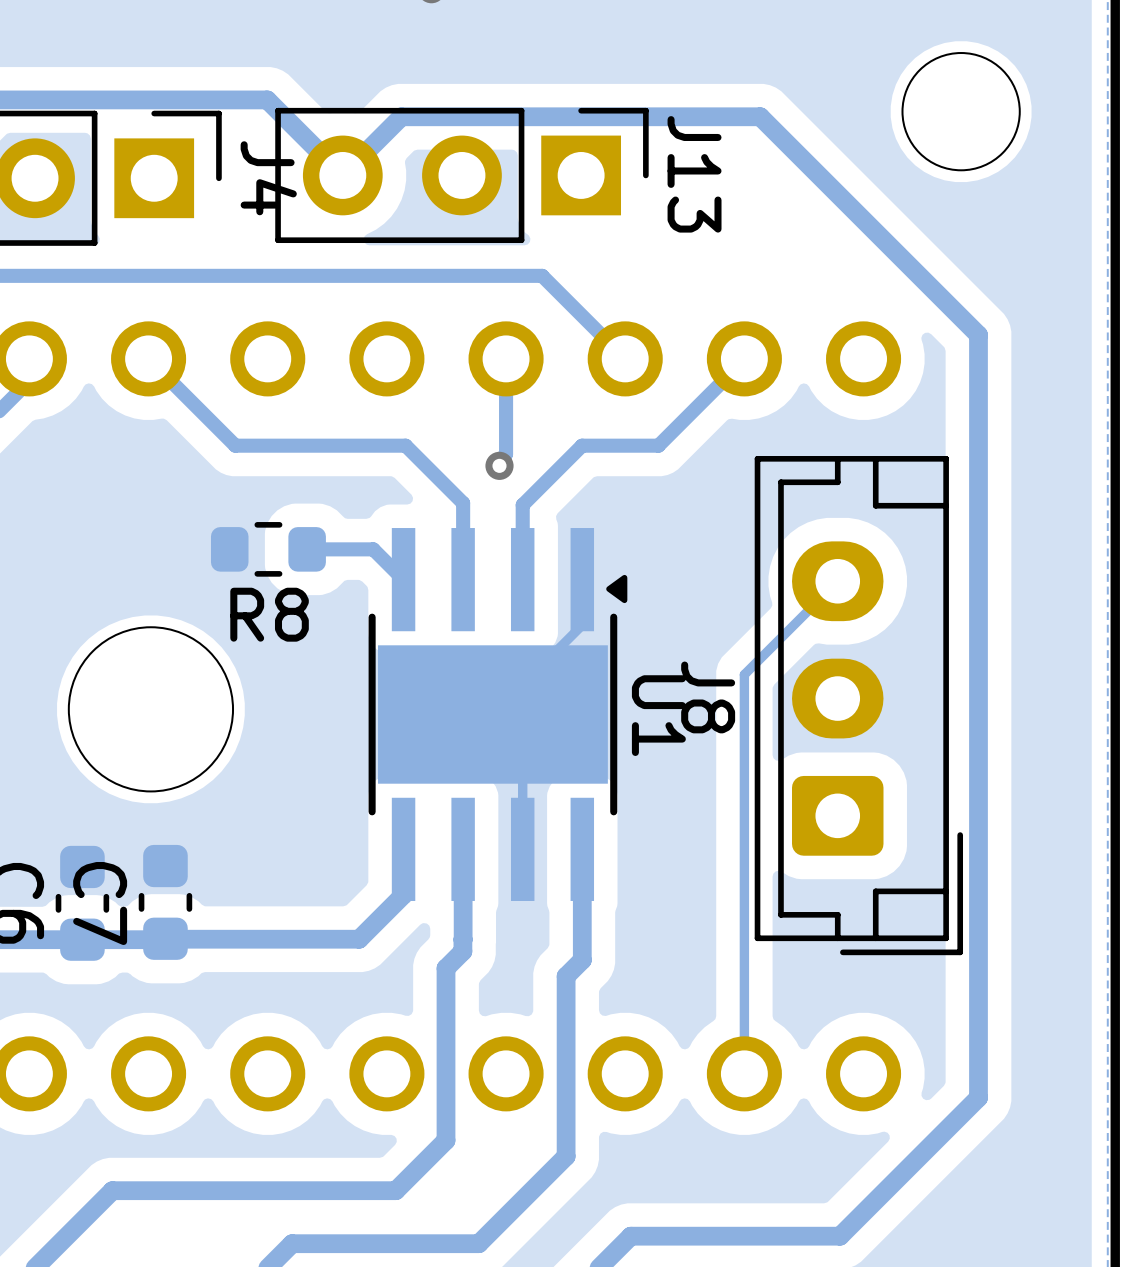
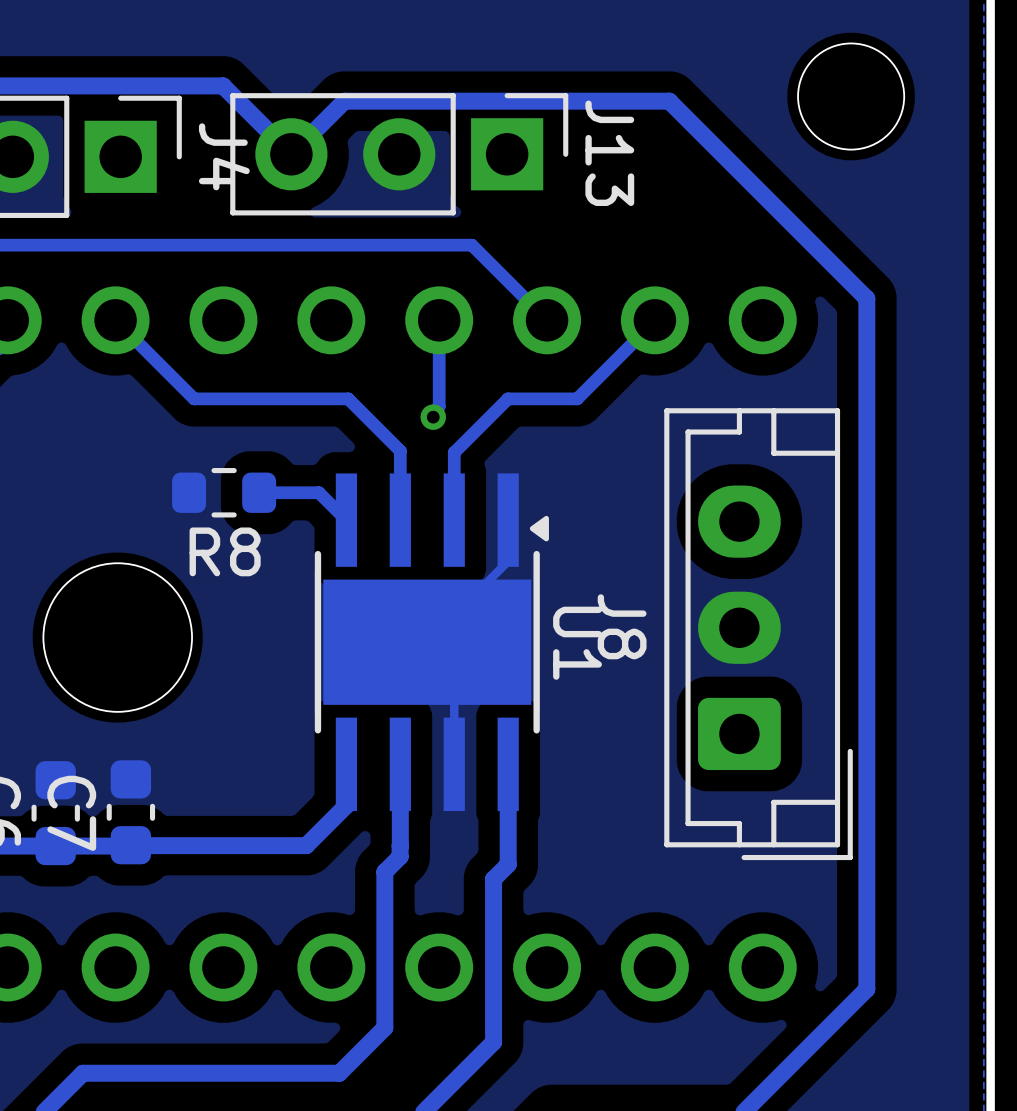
track: (837, 581) (744, 674) (744, 1073) -> none

